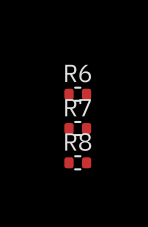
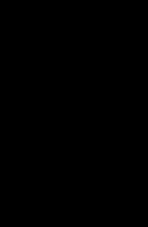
R6: (77, 94) -> none
R7: (77, 128) -> none
R8: (77, 162) -> none

